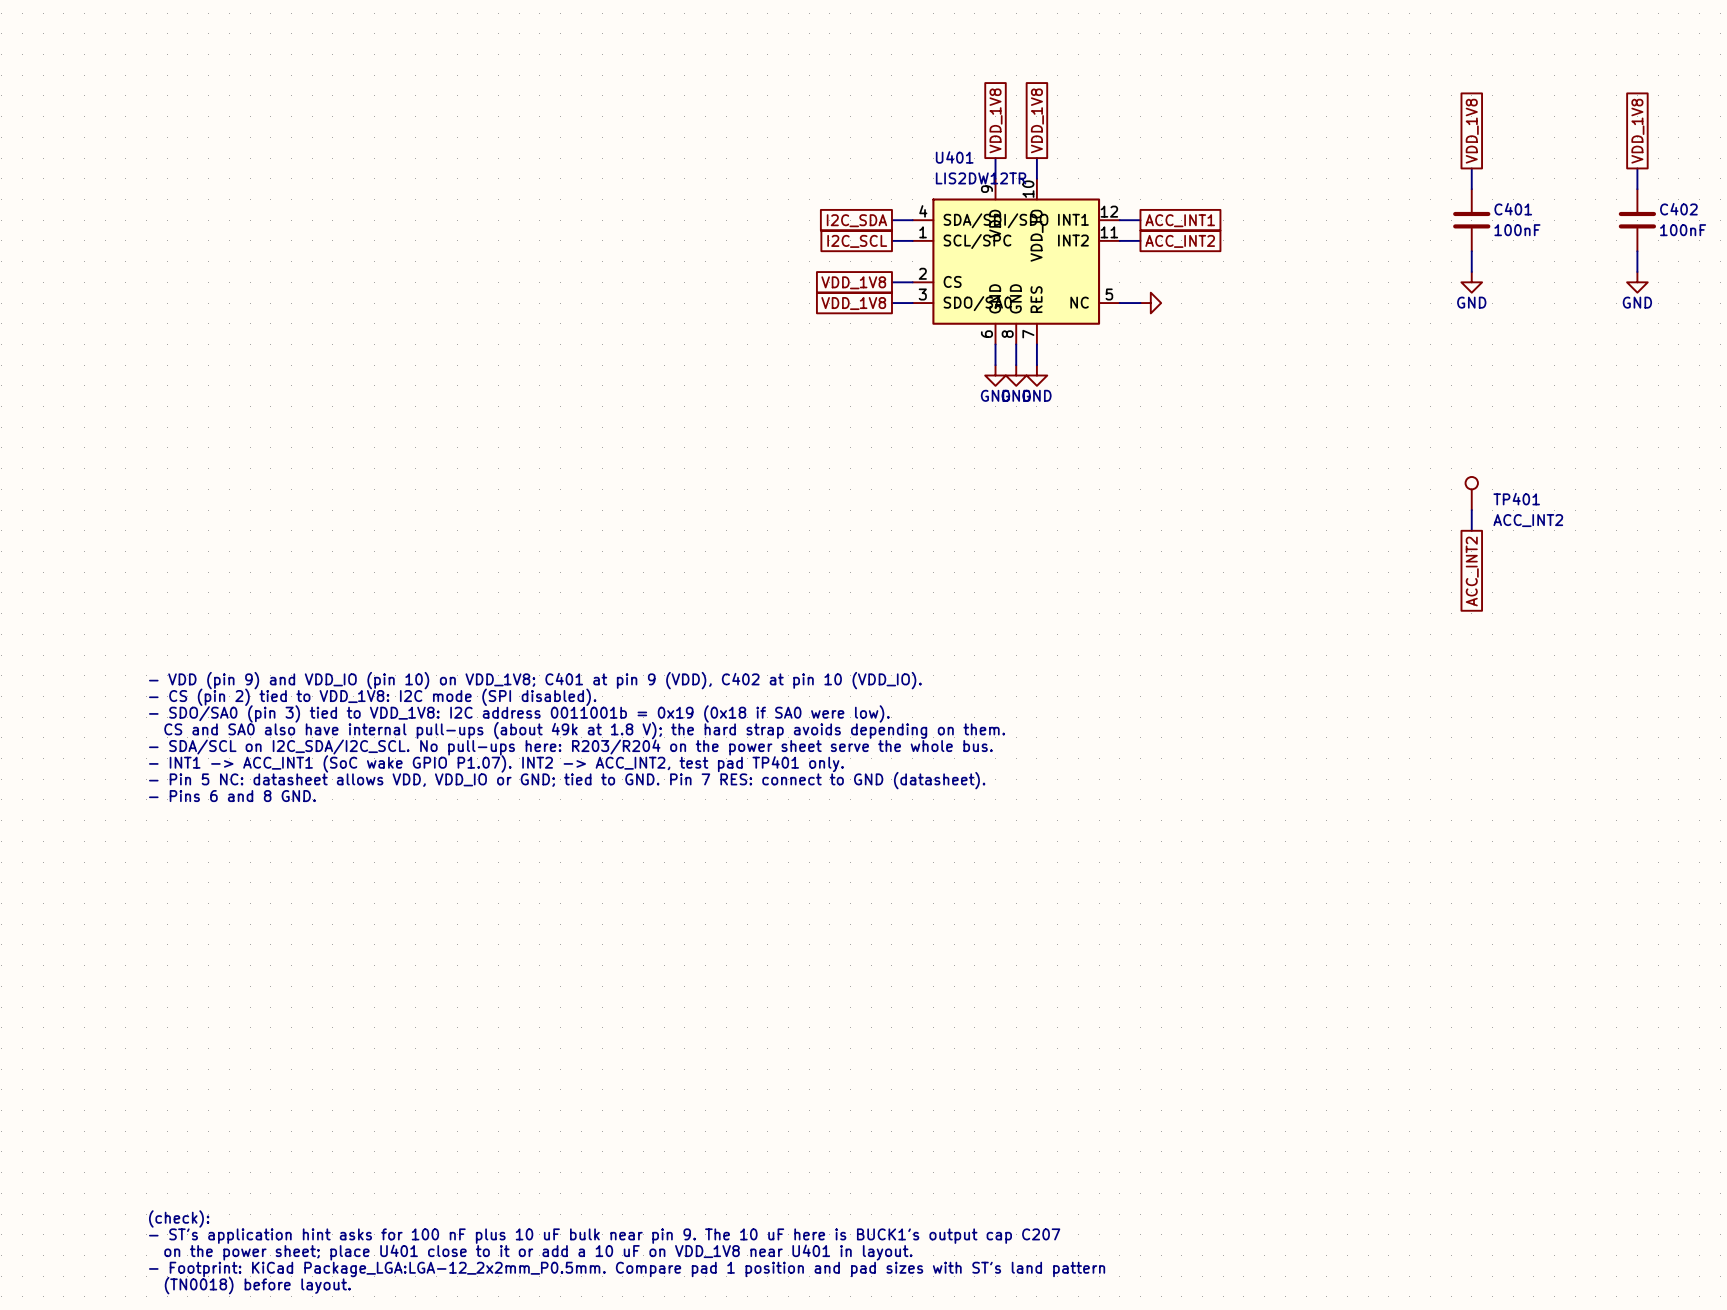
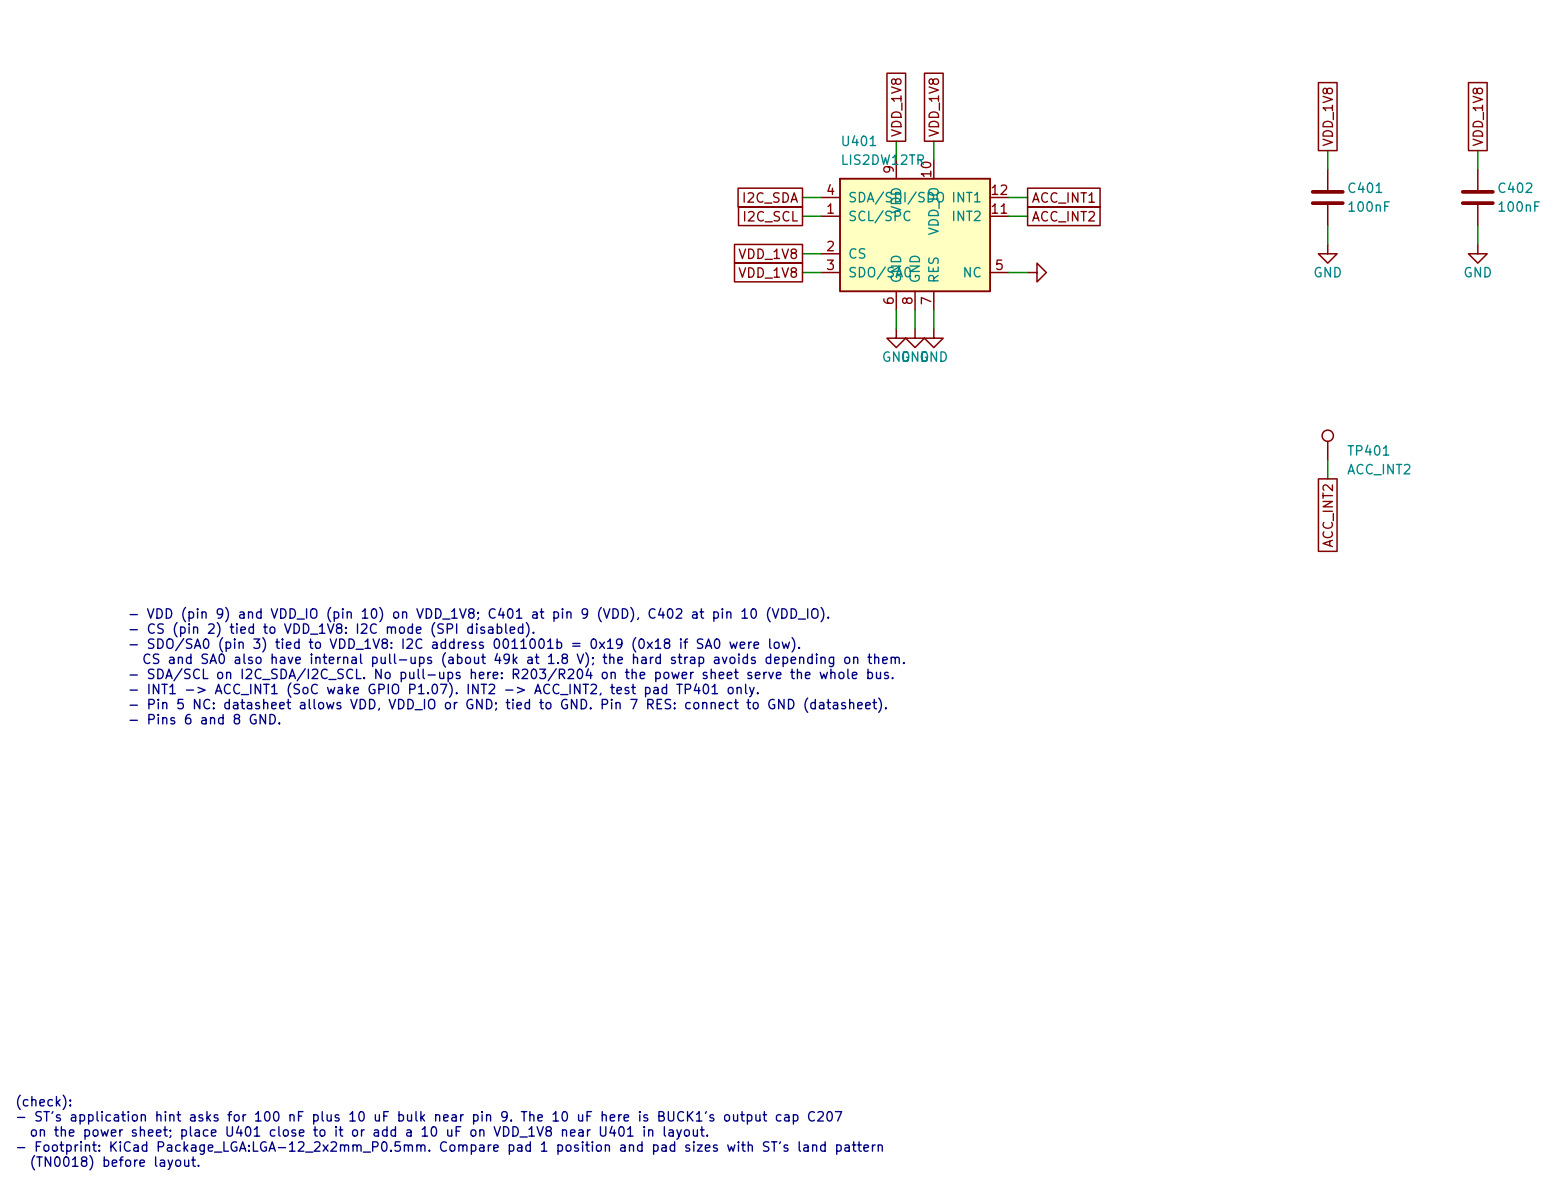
text position: (check): (179, 1218) -> (check): (44, 1102)
text position: - ST's application hint asks for 100 nF plus 10 uF bulk near pin 9. The 10 uF here is BUCK1's output cap C207 (604, 1236) -> - ST's application hint asks for 100 nF plus 10 uF bulk near pin 9. The 10 uF here is BUCK1's output cap C207 (429, 1117)
text position: on the power sheet; place U401 close to it or add a 10 uF on VDD_1V8 near U401 in layout. (538, 1252) -> on the power sheet; place U401 close to it or add a 10 uF on VDD_1V8 near U401 in layout. (369, 1132)
text position: - Footprint: KiCad Package_LGA:LGA-12_2x2mm_P0.5mm. Compare pad 1 position and pad sizes with ST's land pattern (627, 1269) -> - Footprint: KiCad Package_LGA:LGA-12_2x2mm_P0.5mm. Compare pad 1 position and pad sizes with ST's land pattern (449, 1148)
text position: (TN0018) before layout. (257, 1285) -> (TN0018) before layout. (115, 1162)

